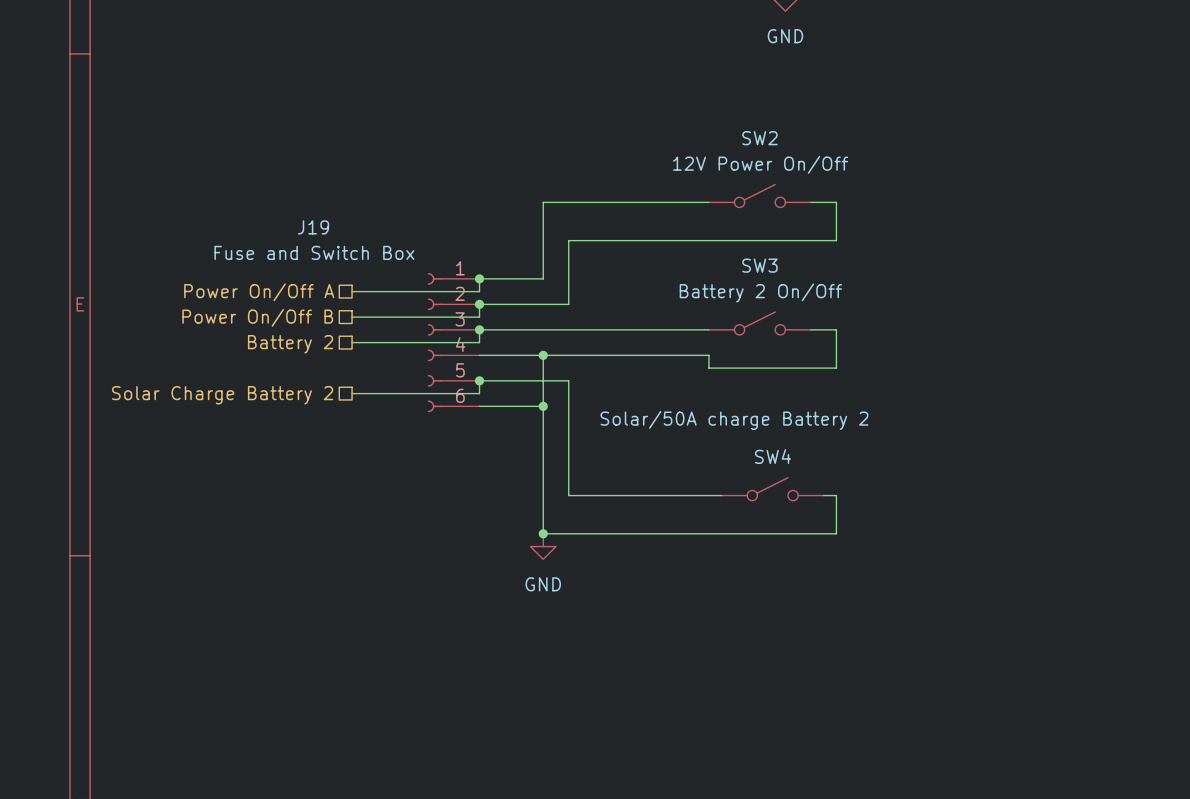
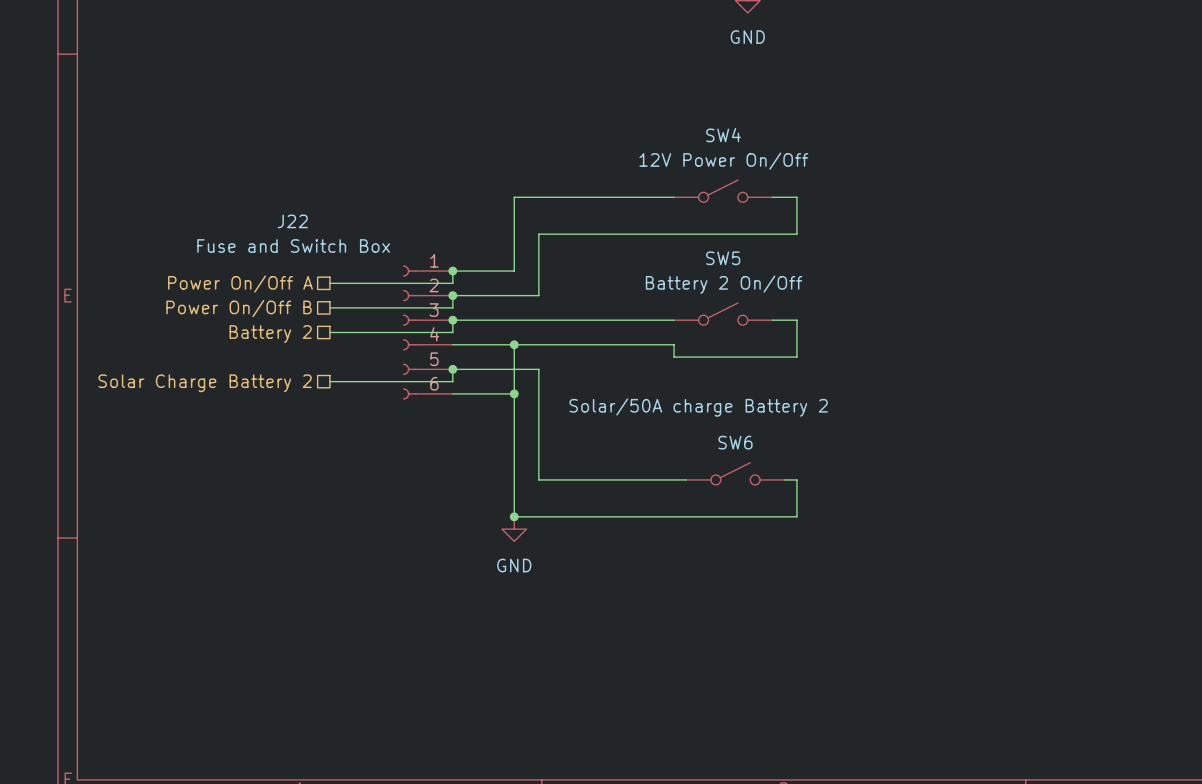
SW2 name: SW2 (759, 138) -> SW4 (723, 135)
J19 name: J19 (313, 227) -> J22 (292, 221)
SW3 name: SW3 (759, 265) -> SW5 (723, 258)
SW4 name: SW4 (772, 456) -> SW6 (735, 442)

